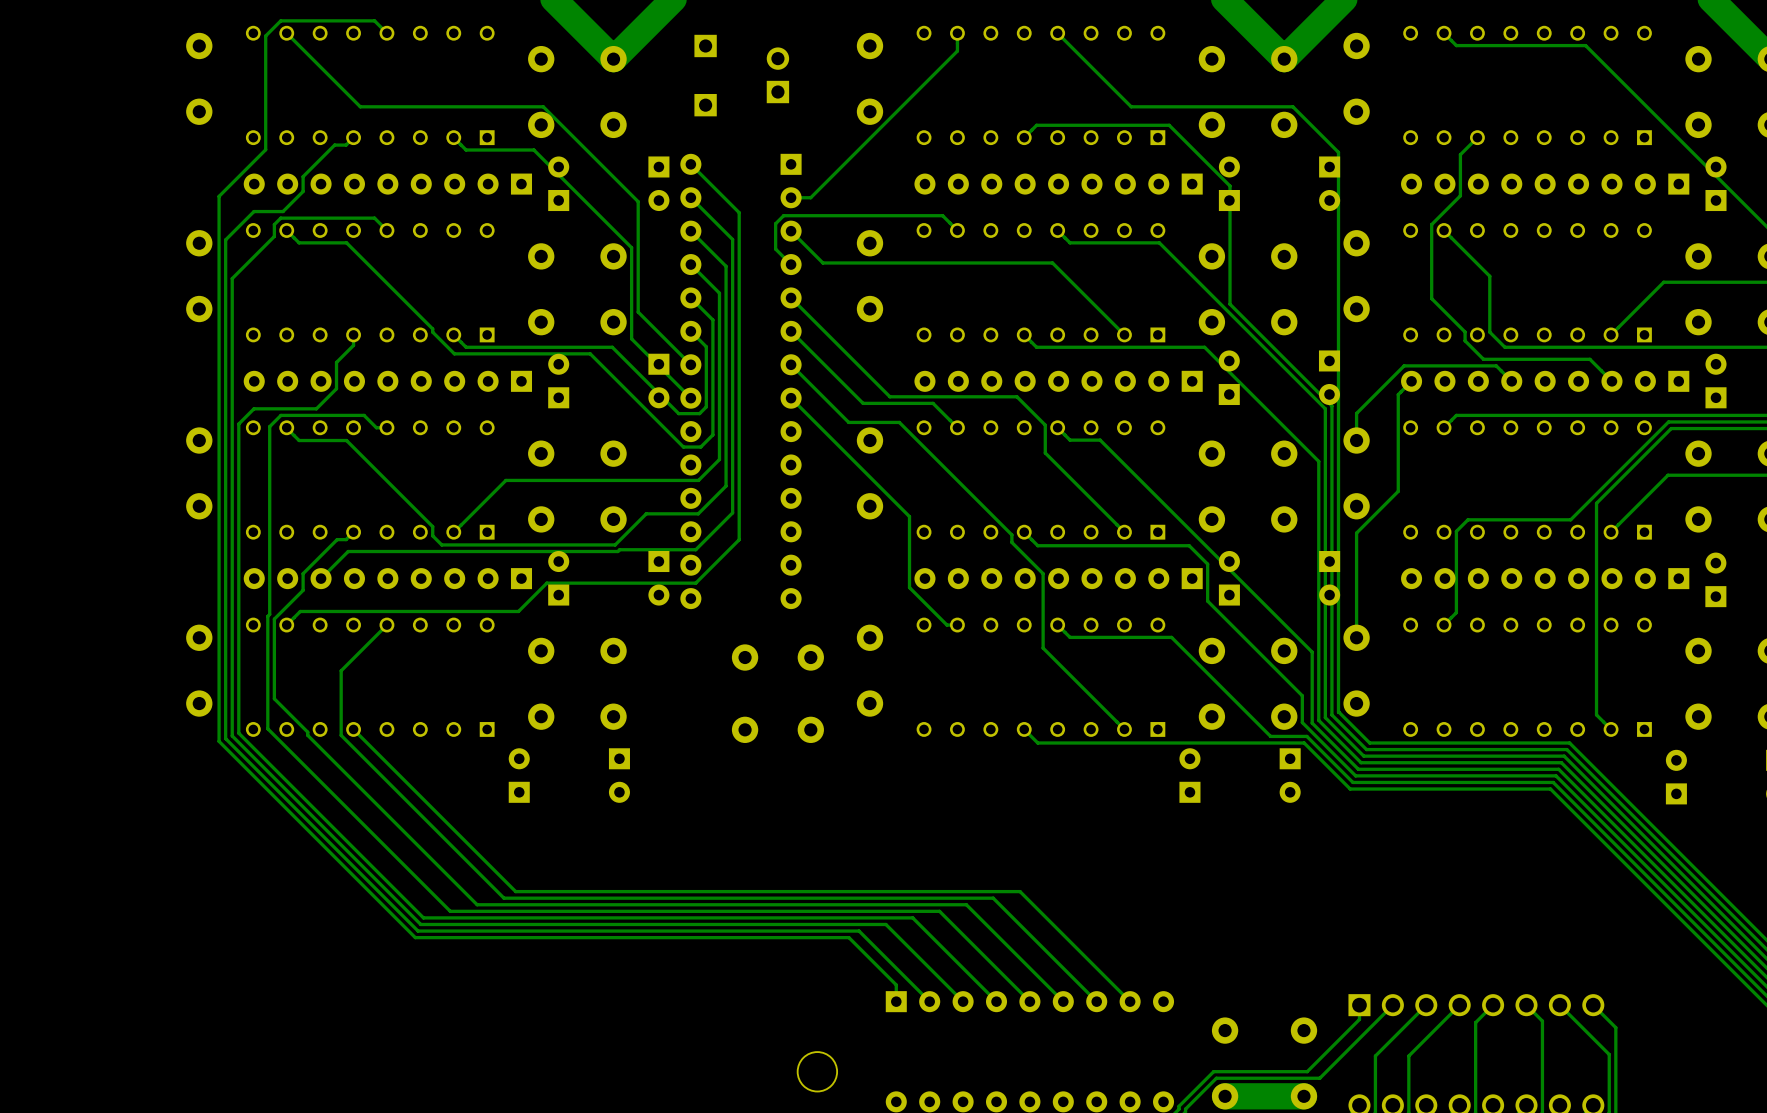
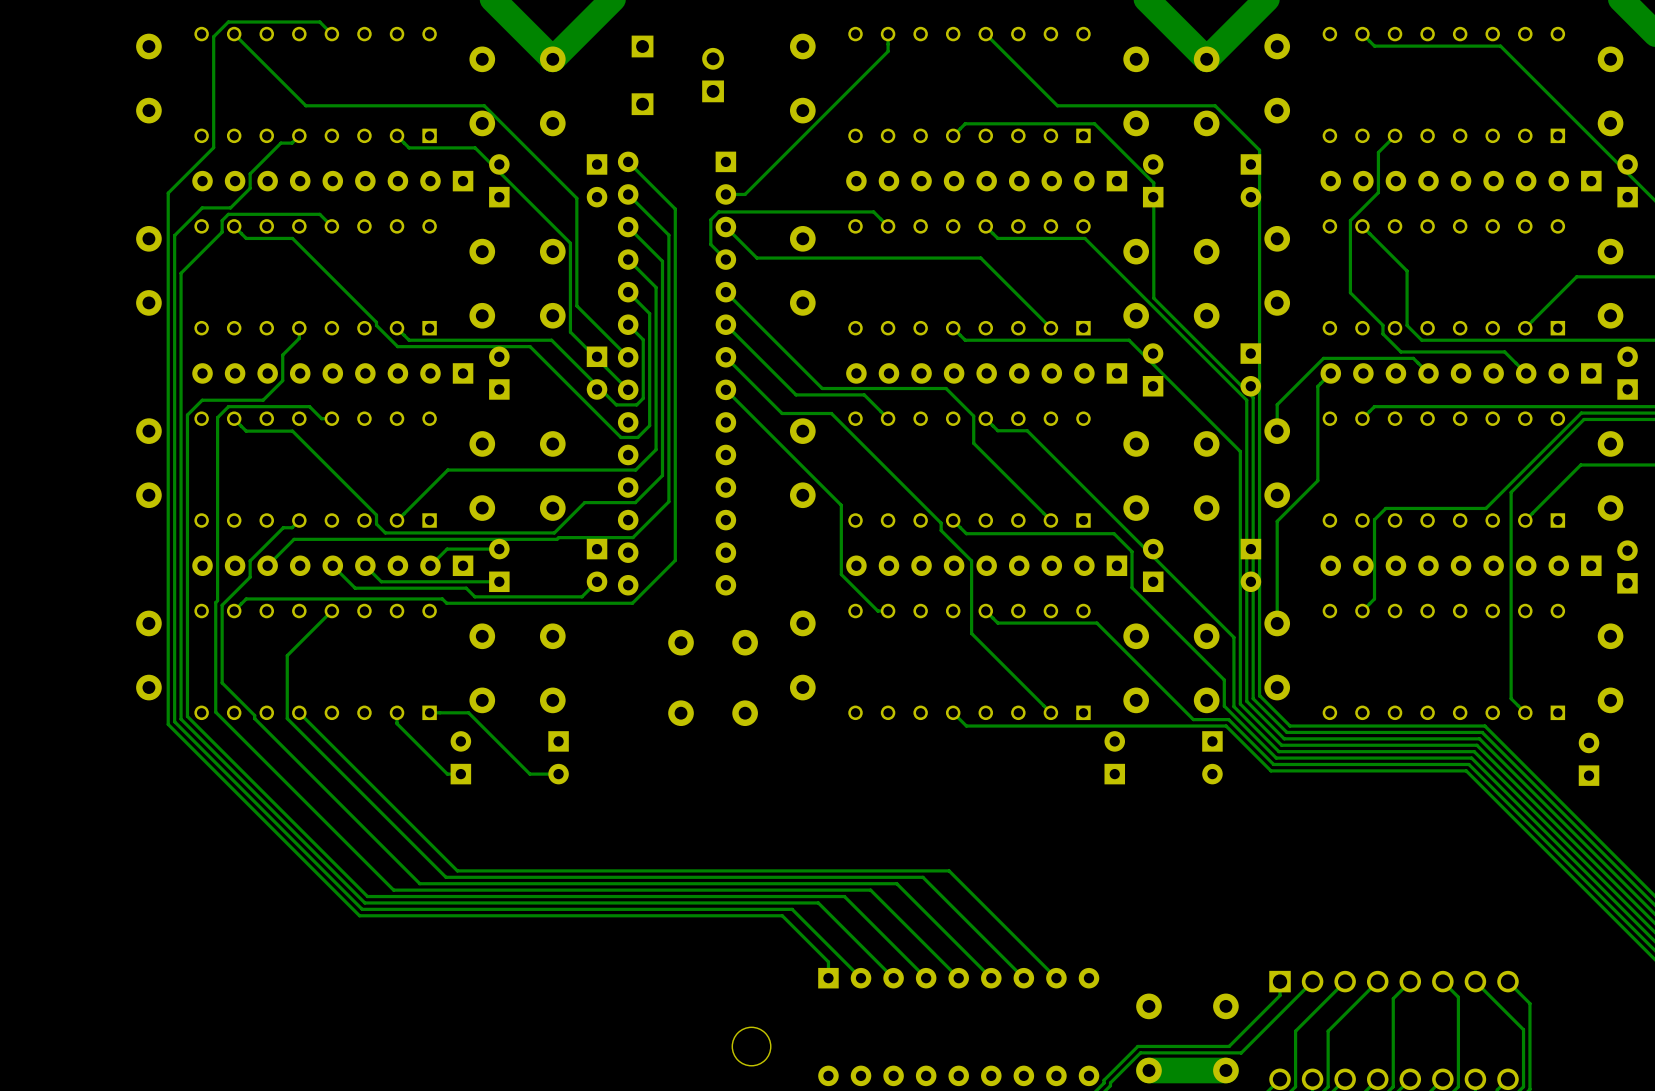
track: (739, 539) (695, 583) (546, 583) (518, 611) (299, 612) -> (675, 527) (675, 560) (632, 603) (446, 603) (442, 598) (246, 598)
track: none -> (499, 549) (447, 549) (430, 565)
track: none -> (332, 565) (355, 588) (466, 588) (474, 596) (581, 596) (597, 581)
track: none -> (365, 565) (381, 581) (499, 581)
track: none -> (397, 712) (397, 723) (447, 774) (460, 774)
track: none -> (429, 712) (468, 712) (529, 774) (558, 774)

